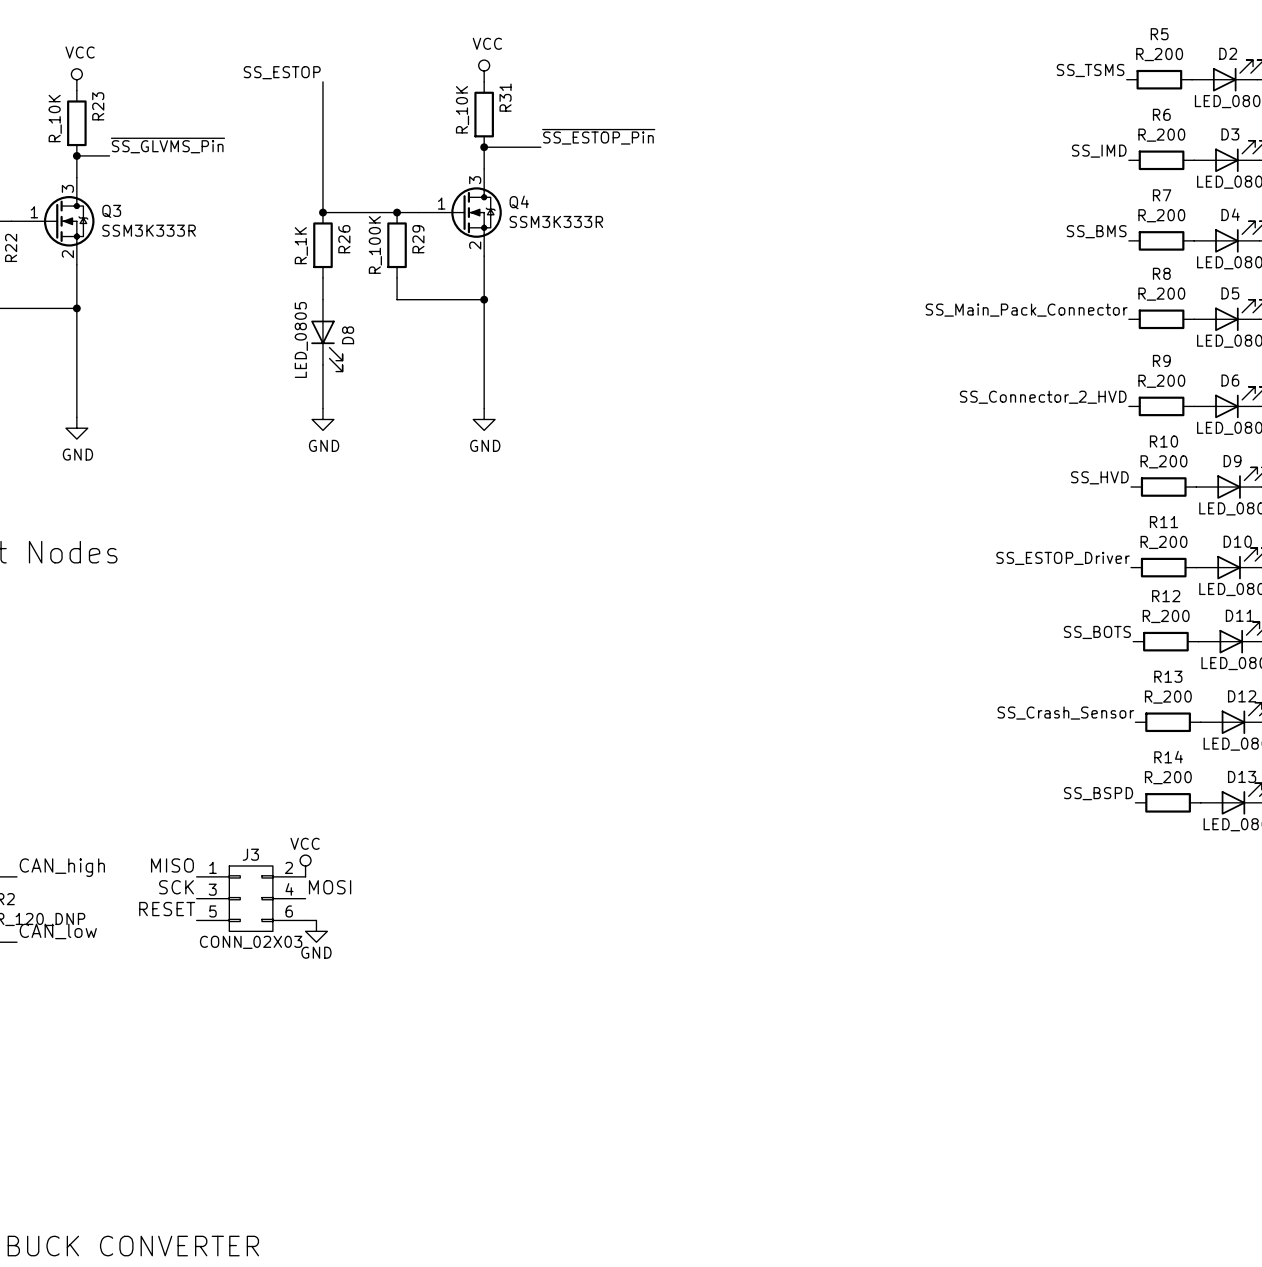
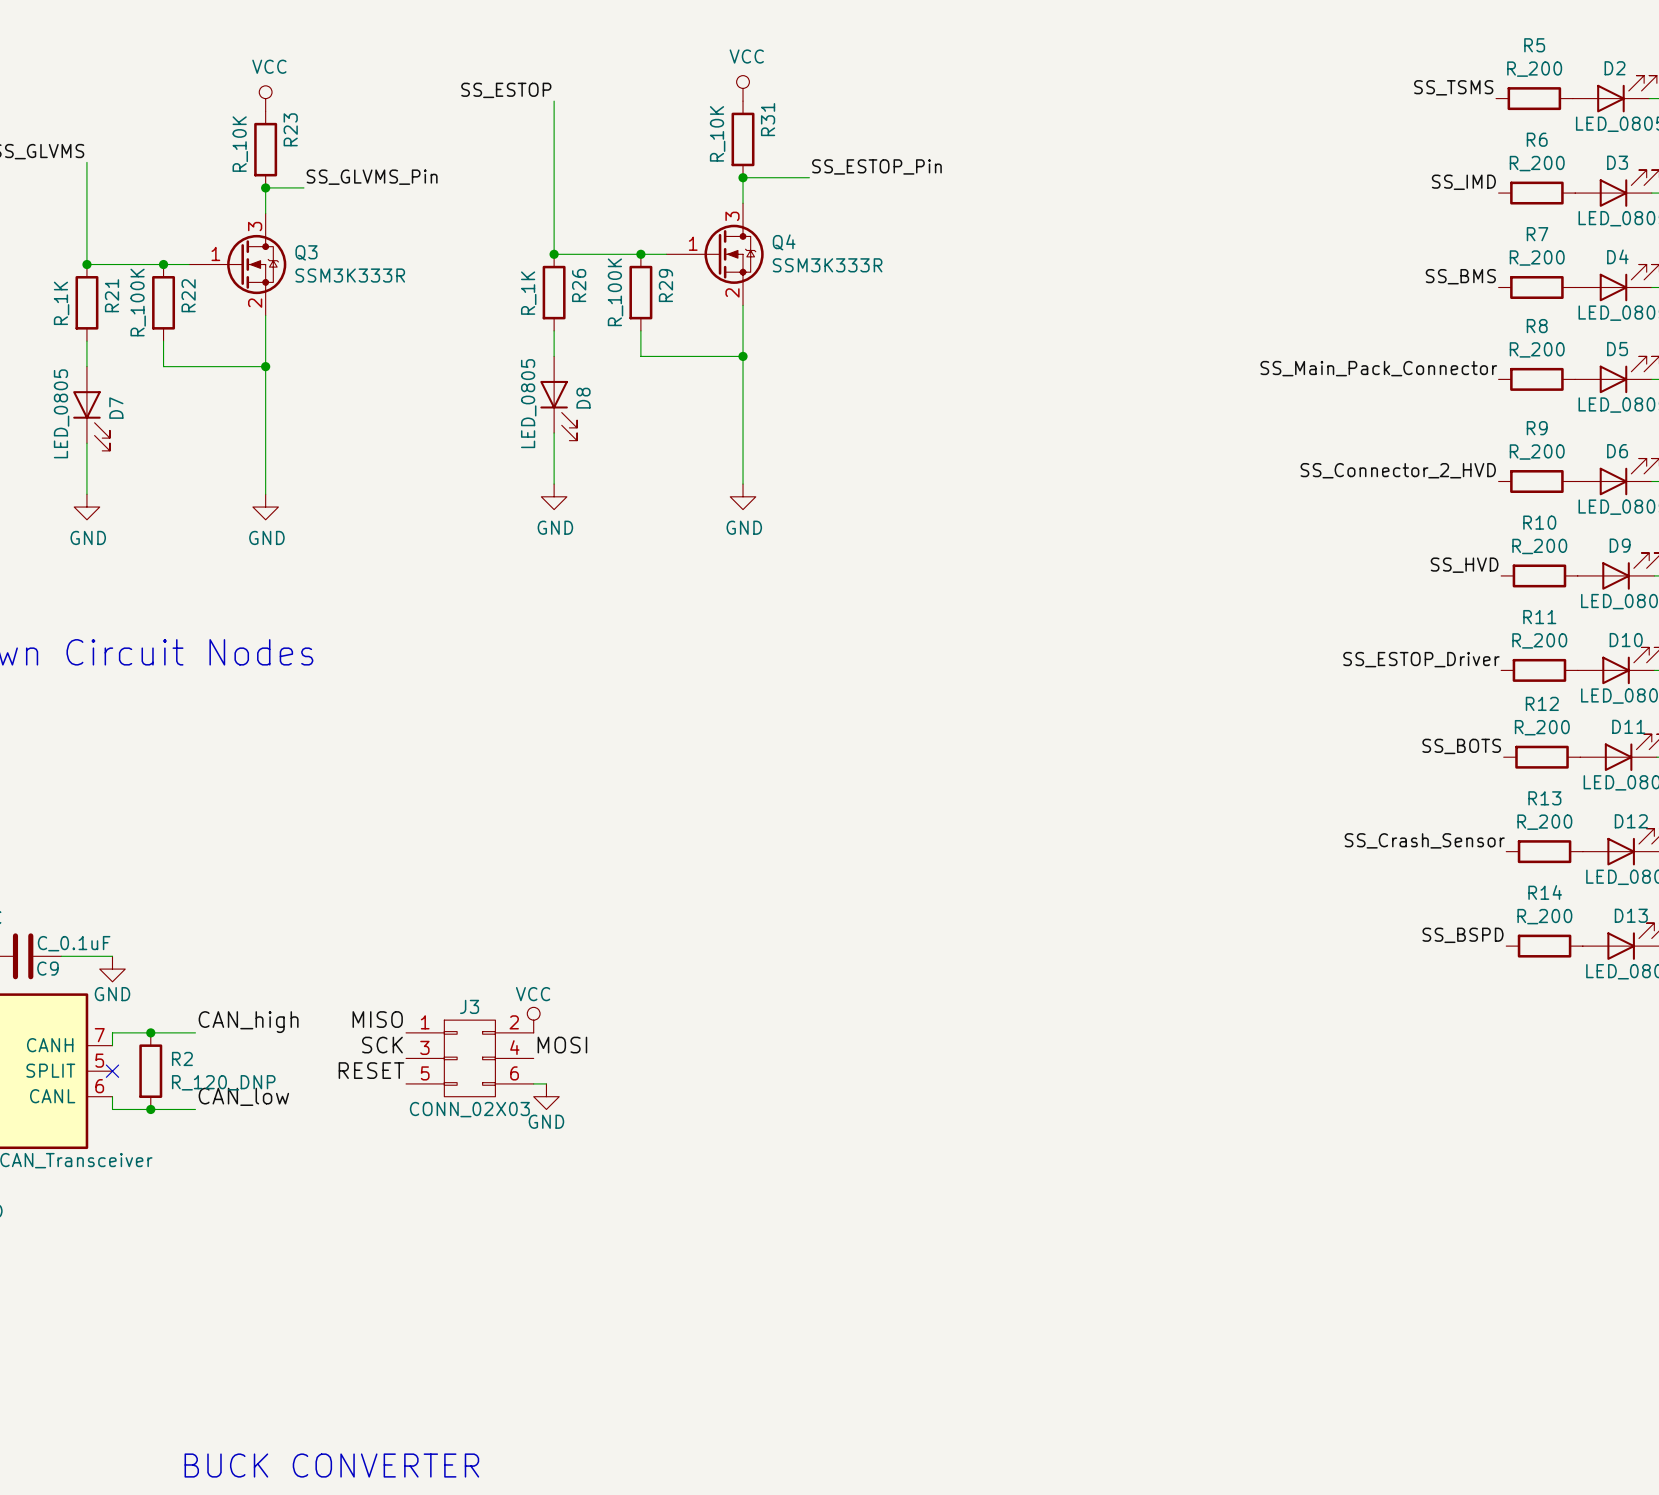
label: ~{SS_ESTOP_Pin} (598, 136) -> SS_ESTOP_Pin (876, 166)
label: ~{SS_GLVMS_Pin} (167, 145) -> SS_GLVMS_Pin (372, 177)

